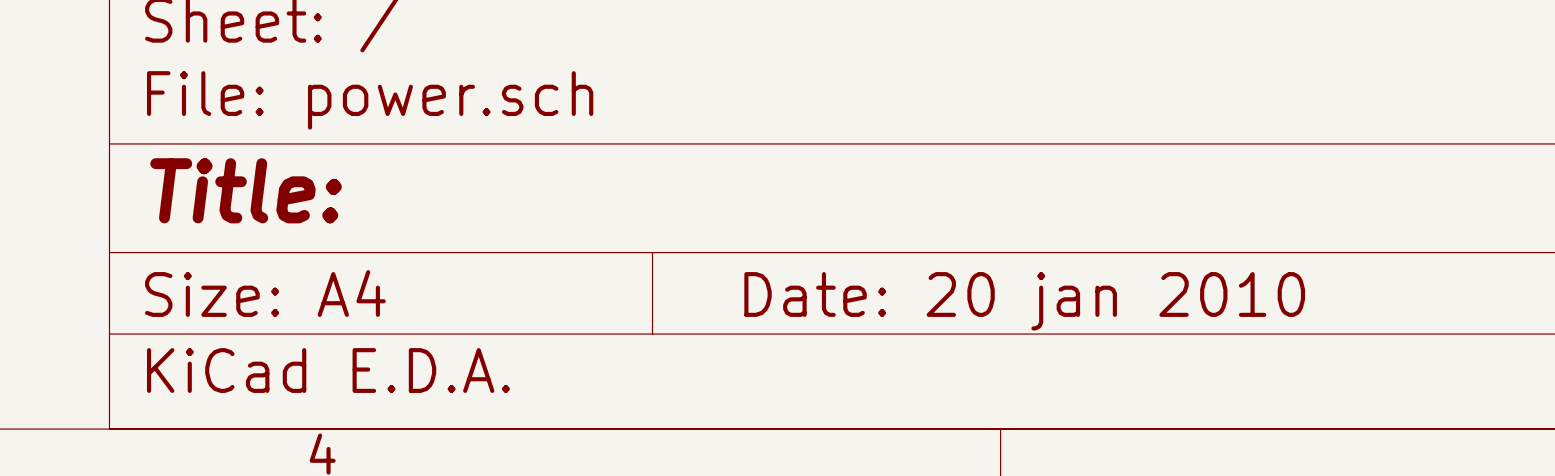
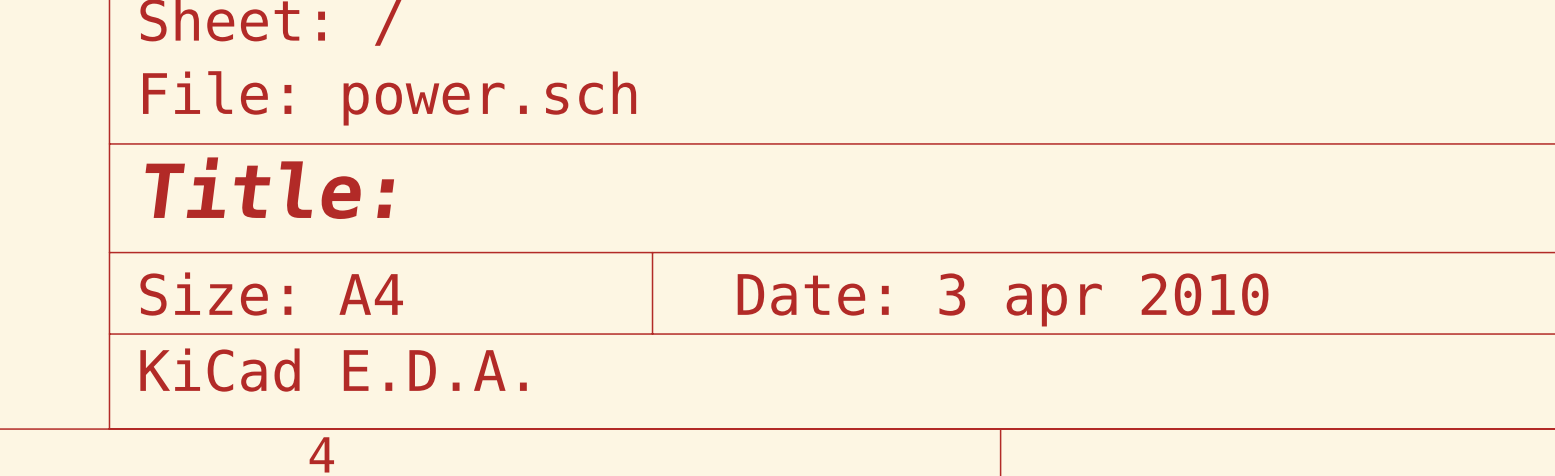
title block: Date: 20 jan 2010 (1024, 301) -> Date: 3 apr 2010 (1003, 299)

